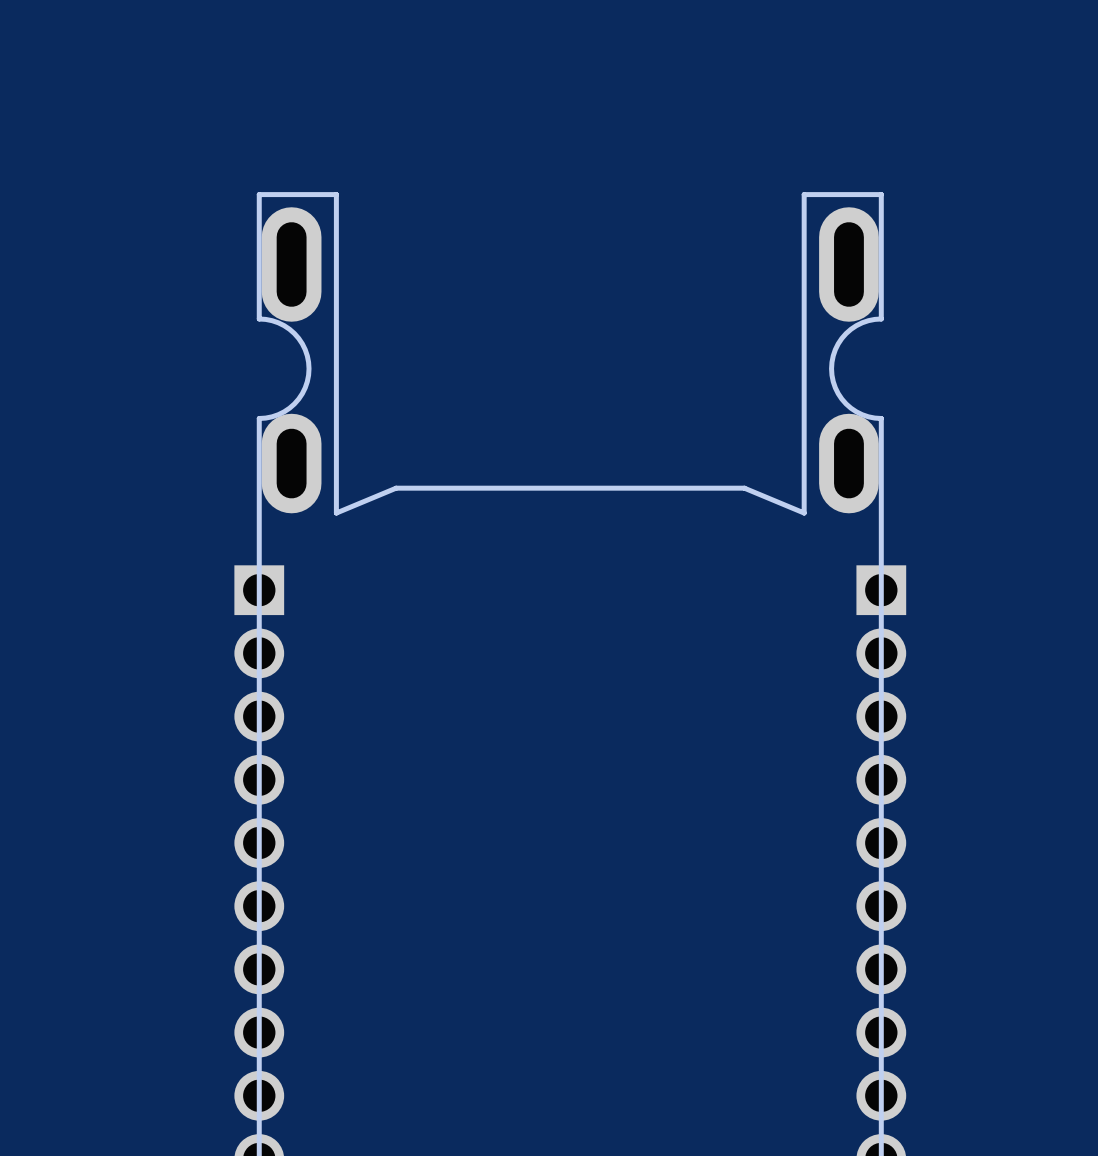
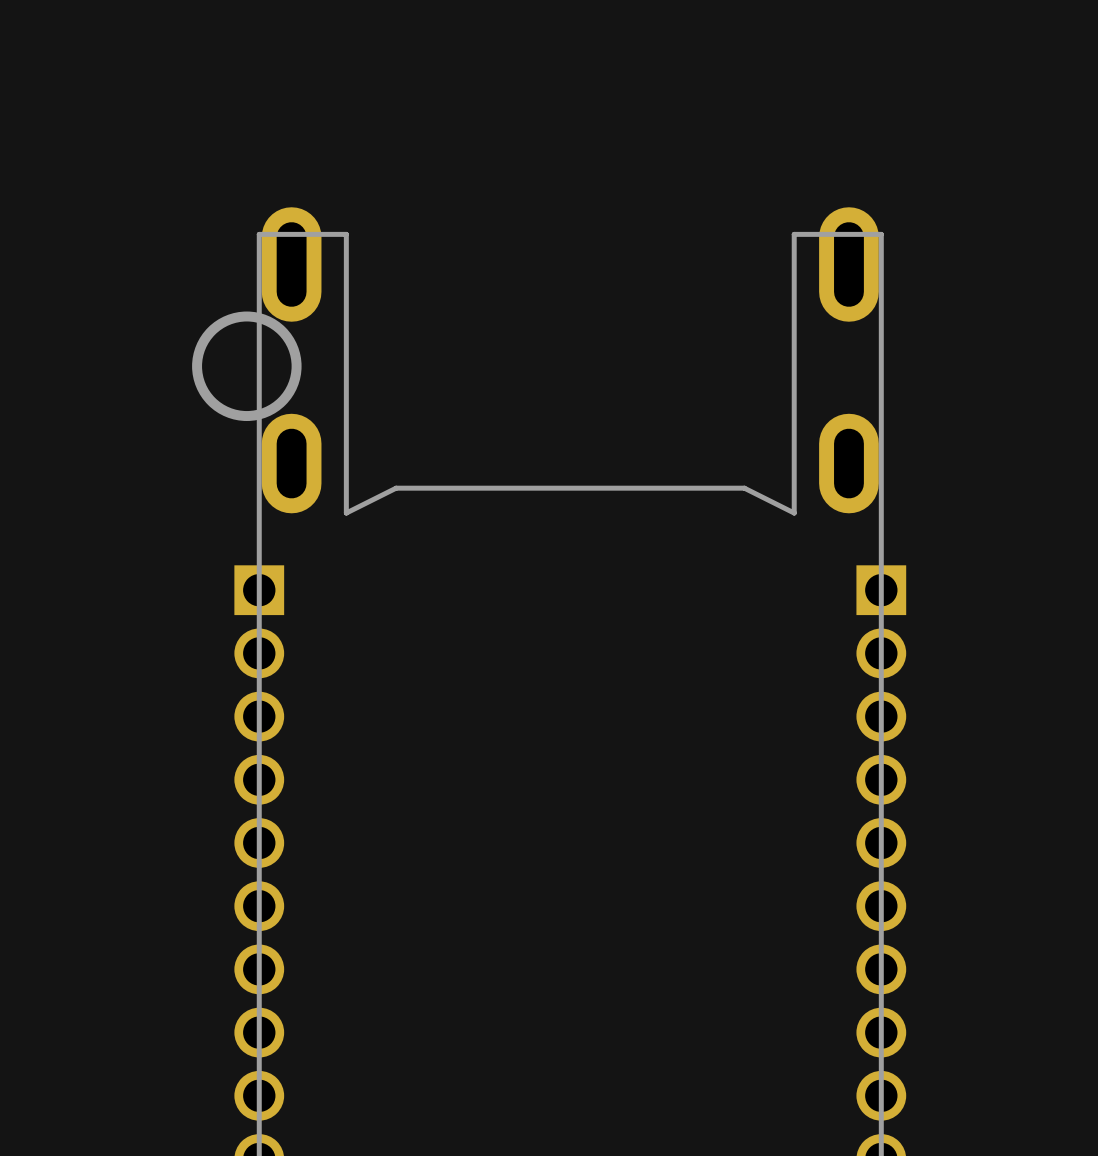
board edge: (259, 234) (259, 194) (336, 194) (336, 513) (396, 488) -> (259, 234) (346, 234) (346, 513) (396, 488)
board edge: (881, 234) (881, 194) (804, 194) (804, 513) (744, 488) -> (881, 234) (794, 234) (794, 513) (744, 488)
round board edge: none -> [192, 311, 302, 422]
board edge: (259, 318) (278, 322) (294, 333) (305, 349) (309, 368) (305, 387) (294, 403) (278, 414) (259, 418) -> (259, 318) (259, 418)
board edge: (881, 318) (862, 322) (846, 333) (835, 349) (831, 368) (835, 387) (846, 403) (862, 414) (881, 418) -> (881, 318) (881, 418)

